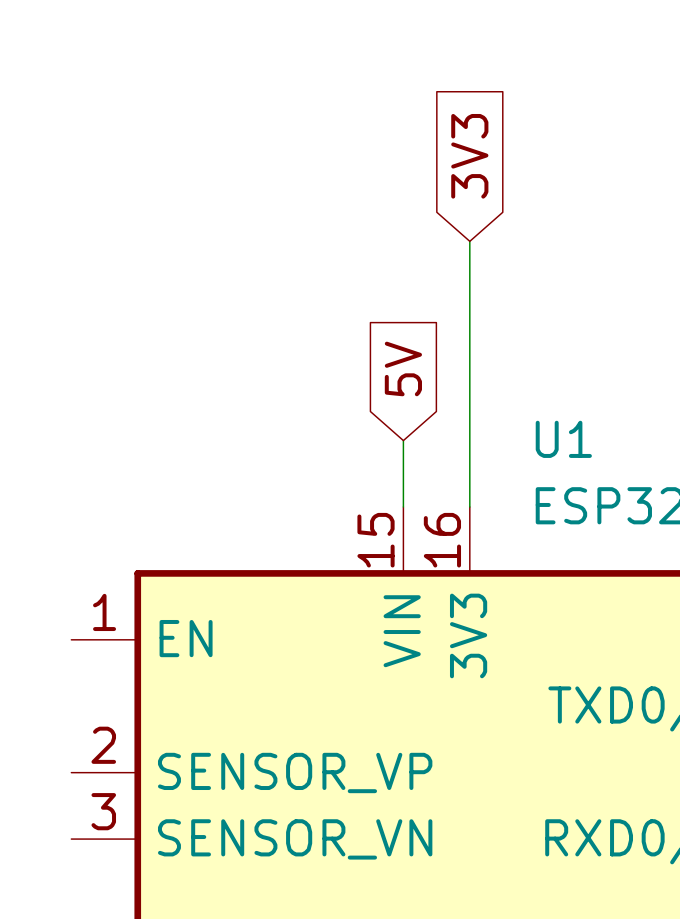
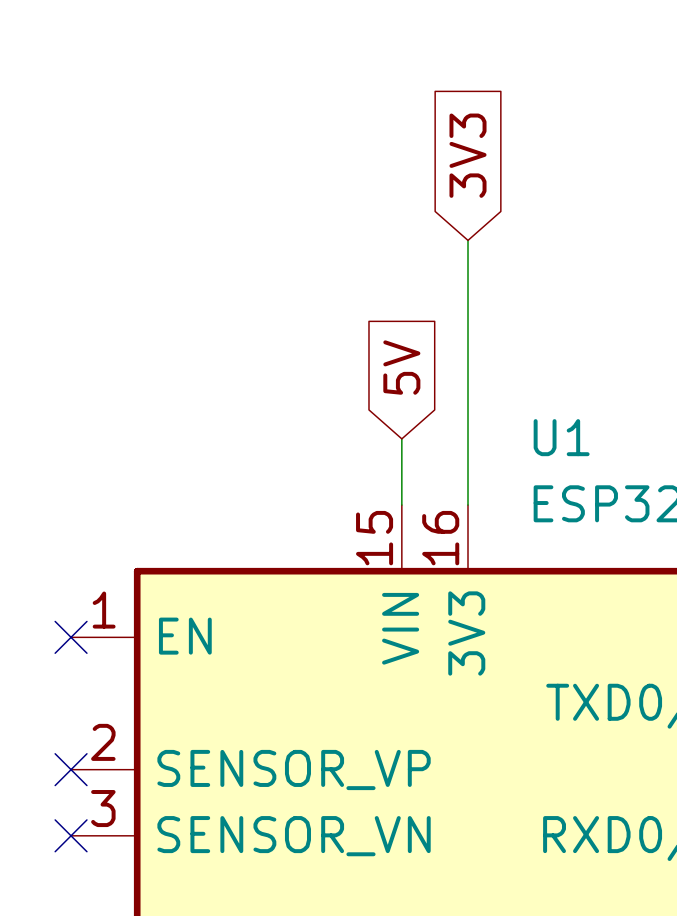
no-connect mark: none -> (71, 637)
no-connect mark: none -> (71, 769)
no-connect mark: none -> (71, 835)

